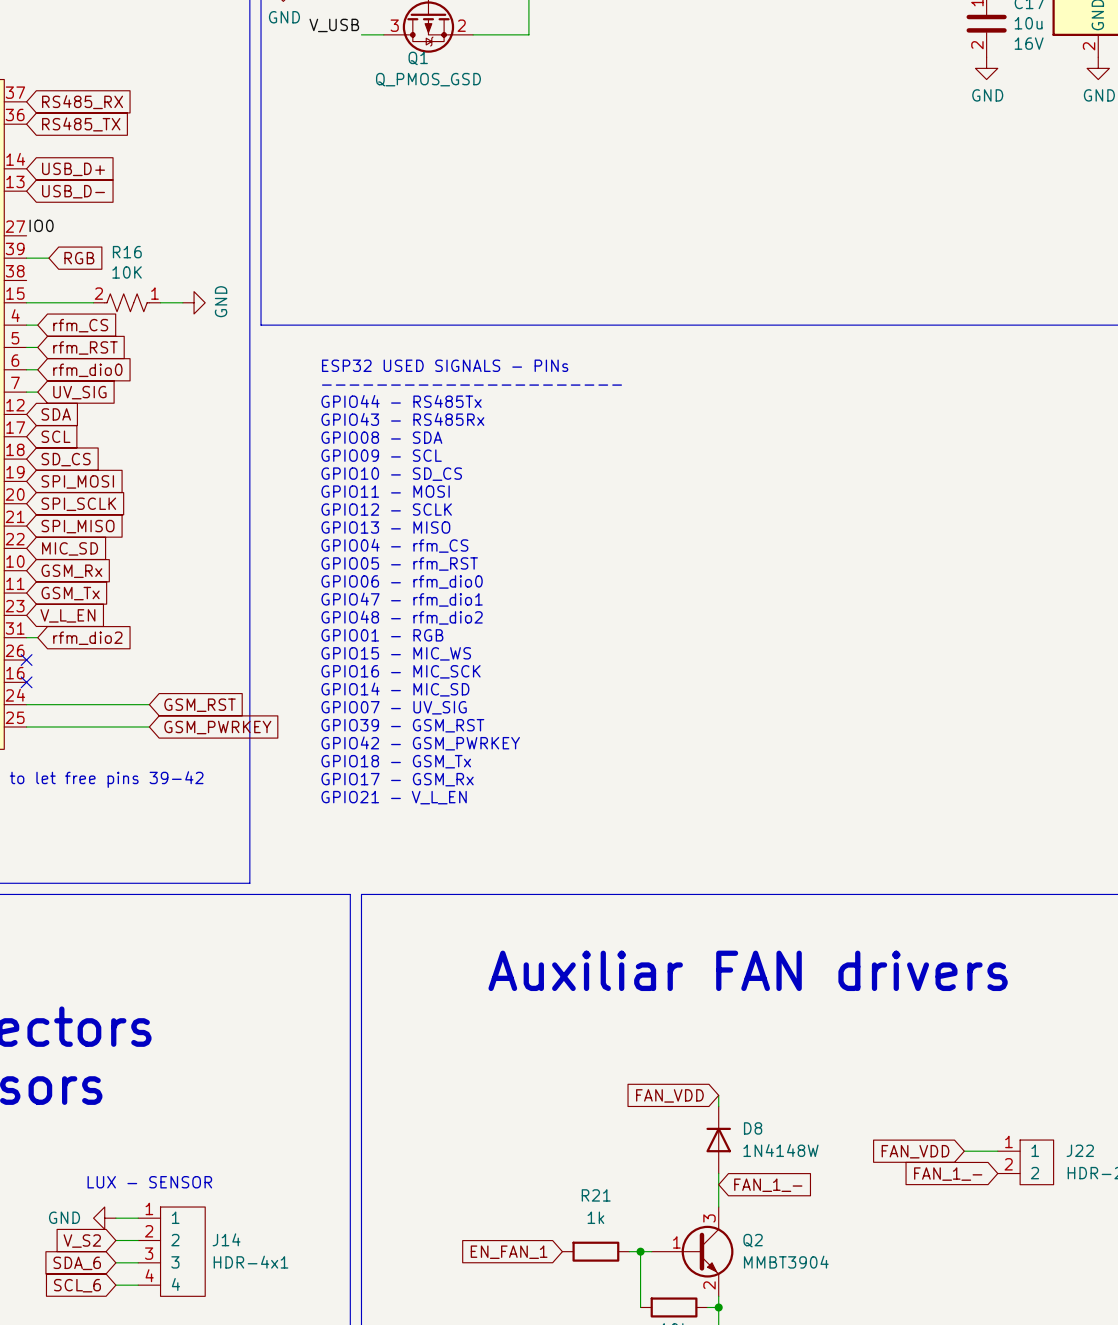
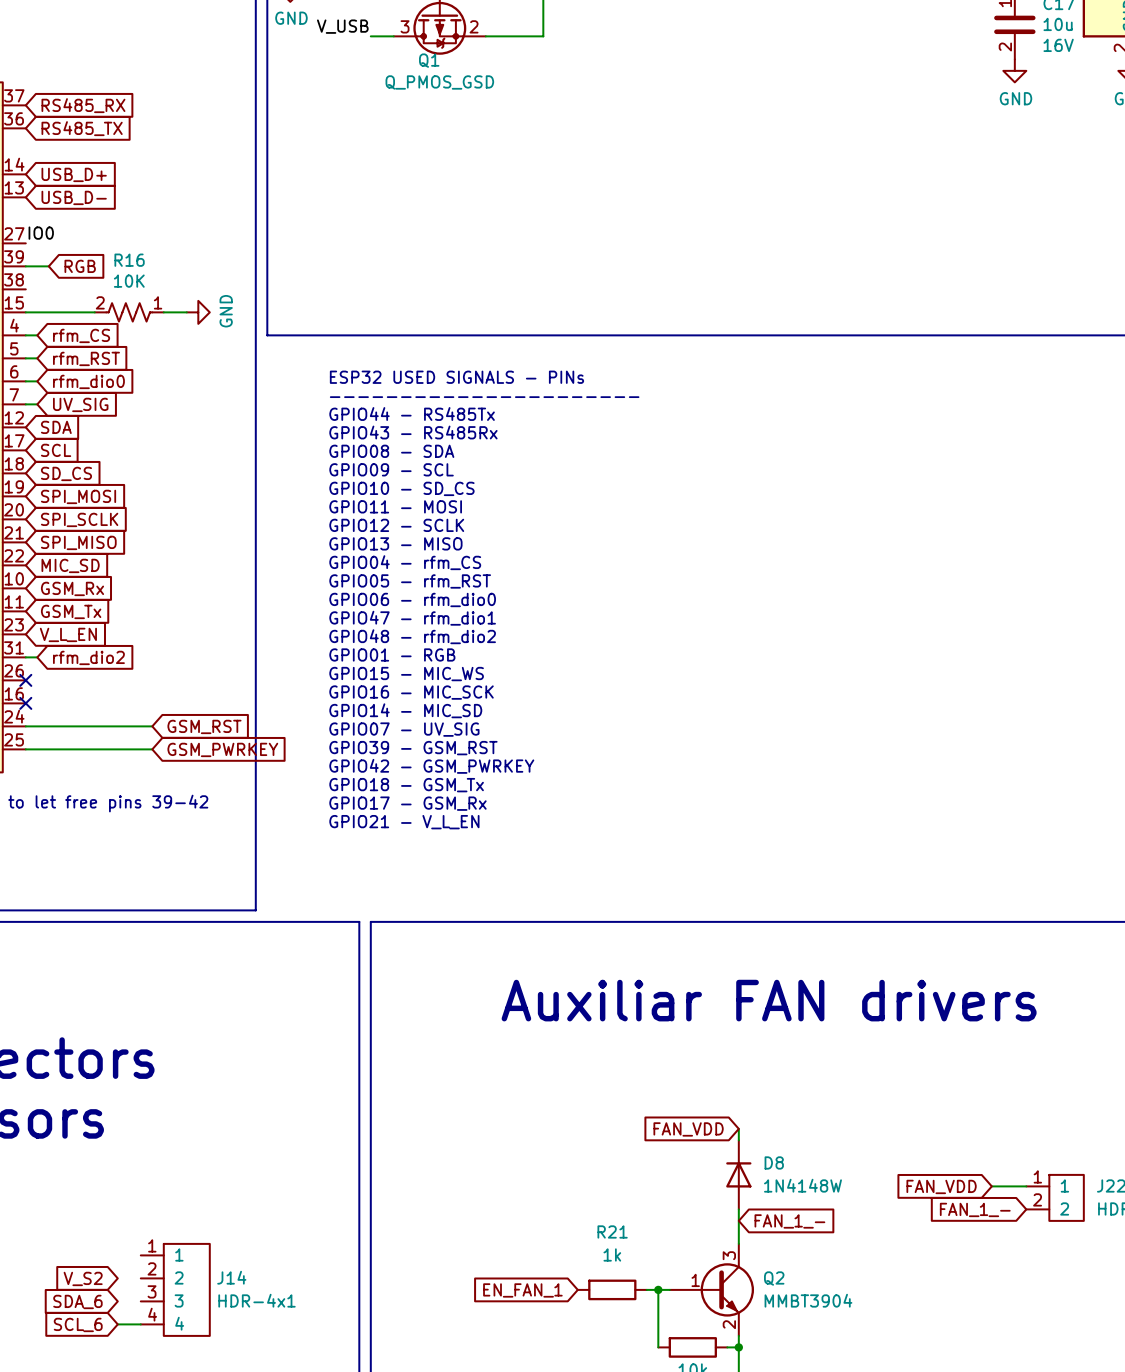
text: LUX - SENSOR (149, 1182) -> none
power symbol: GND (104, 1218) -> none
wire: (115, 1218) (138, 1218) -> none
wire: (115, 1240) (138, 1240) -> none
wire: (115, 1262) (138, 1262) -> none

